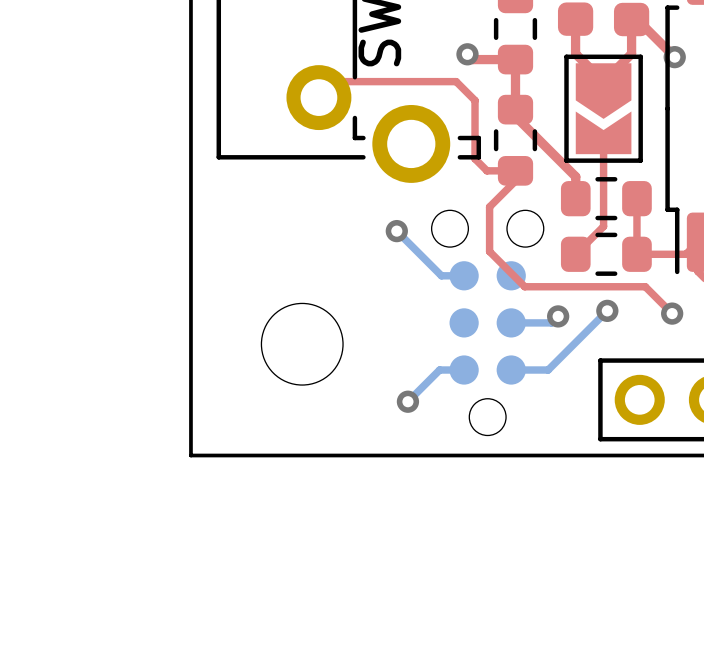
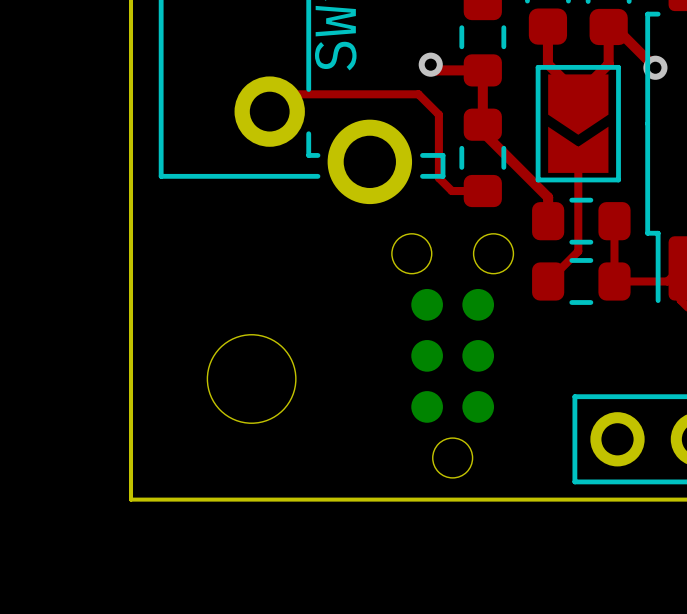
top track: (515, 170) (515, 181) (489, 206) (489, 251) (524, 286) (645, 286) (672, 313) -> none
bottom track: (396, 231) (441, 275) (464, 275) -> none
via: (396, 231) -> none
bottom track: (607, 310) (548, 370) (511, 370) -> none
via: (607, 310) -> none
via: (672, 313) -> none
bottom track: (558, 316) (551, 322) (511, 322) -> none
via: (558, 316) -> none
bottom track: (464, 370) (439, 370) (407, 401) -> none
via: (407, 401) -> none

